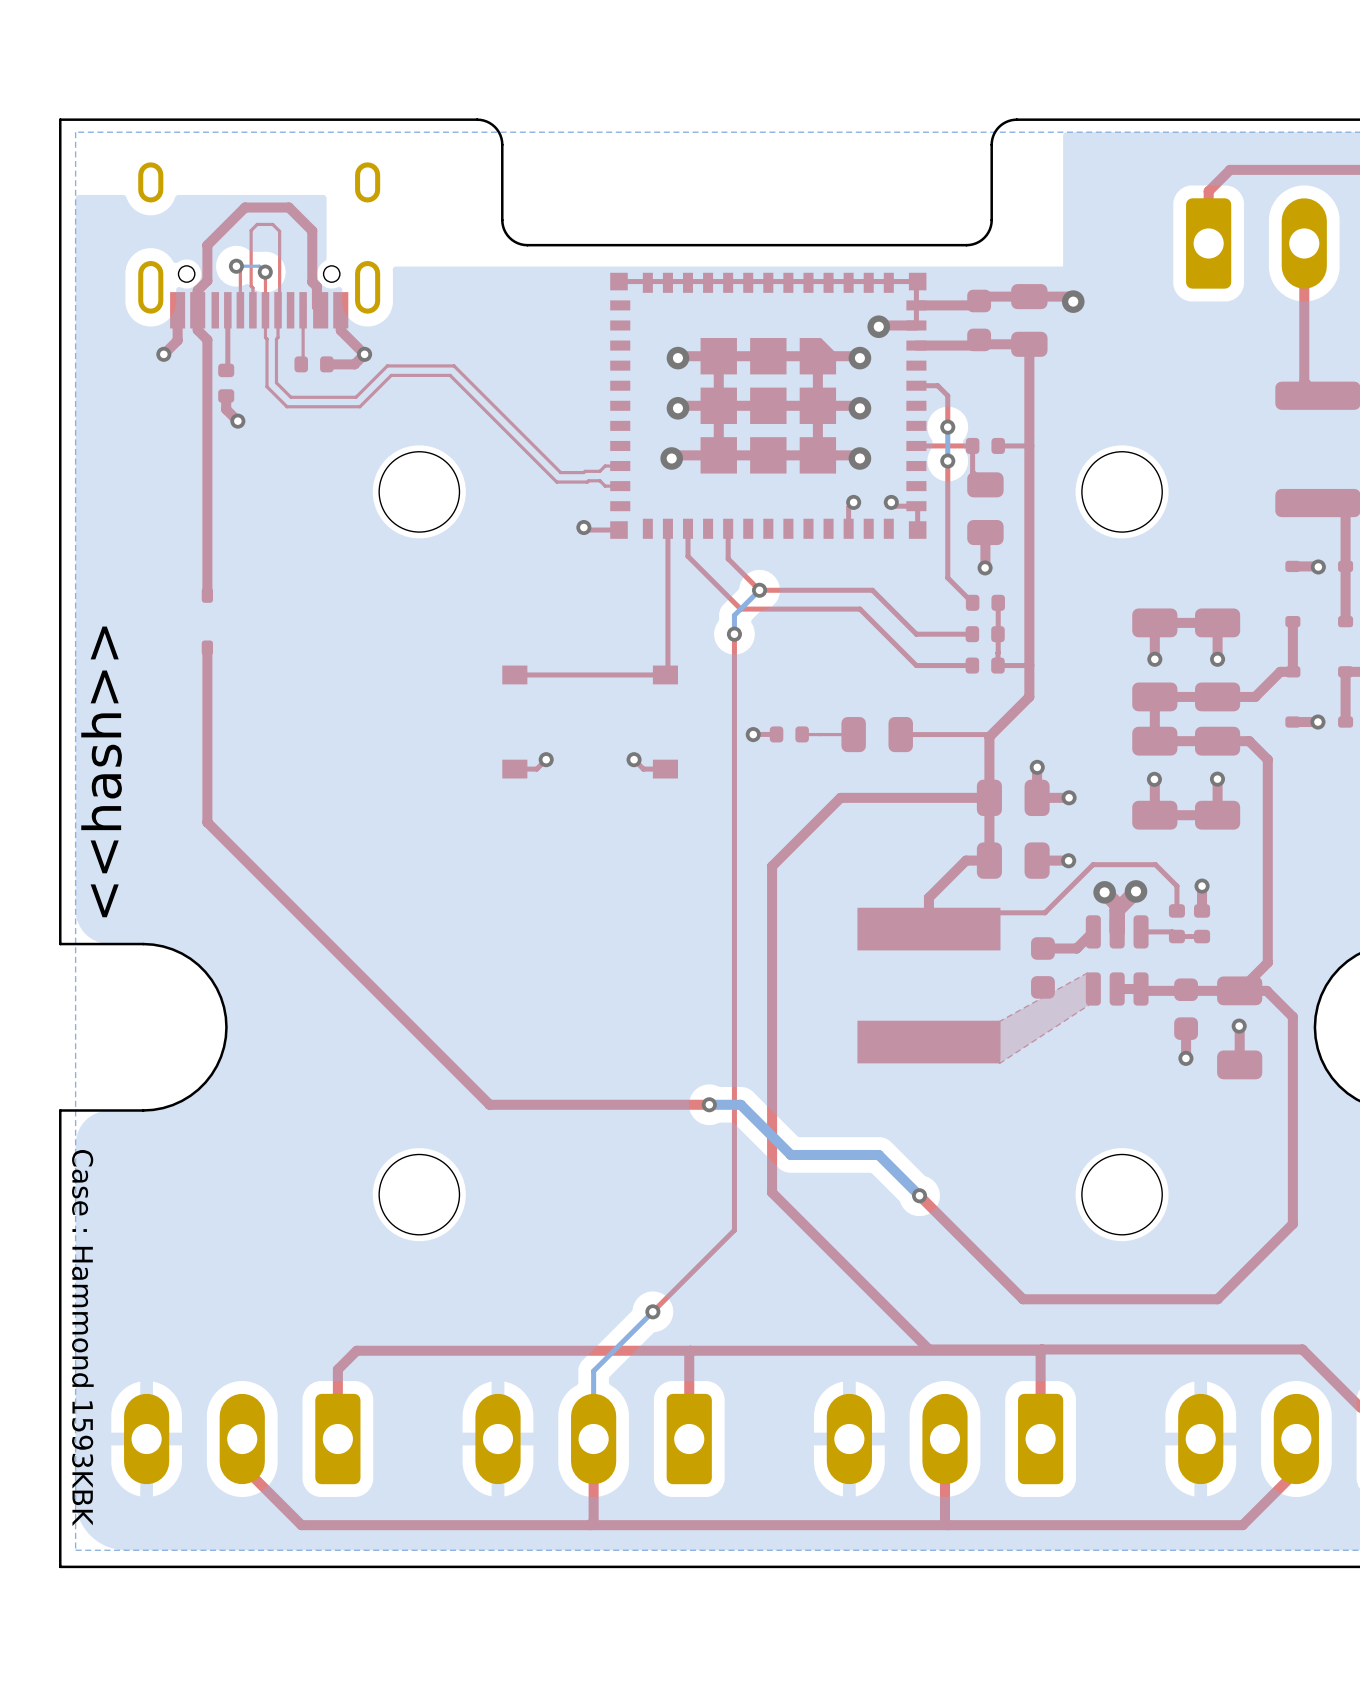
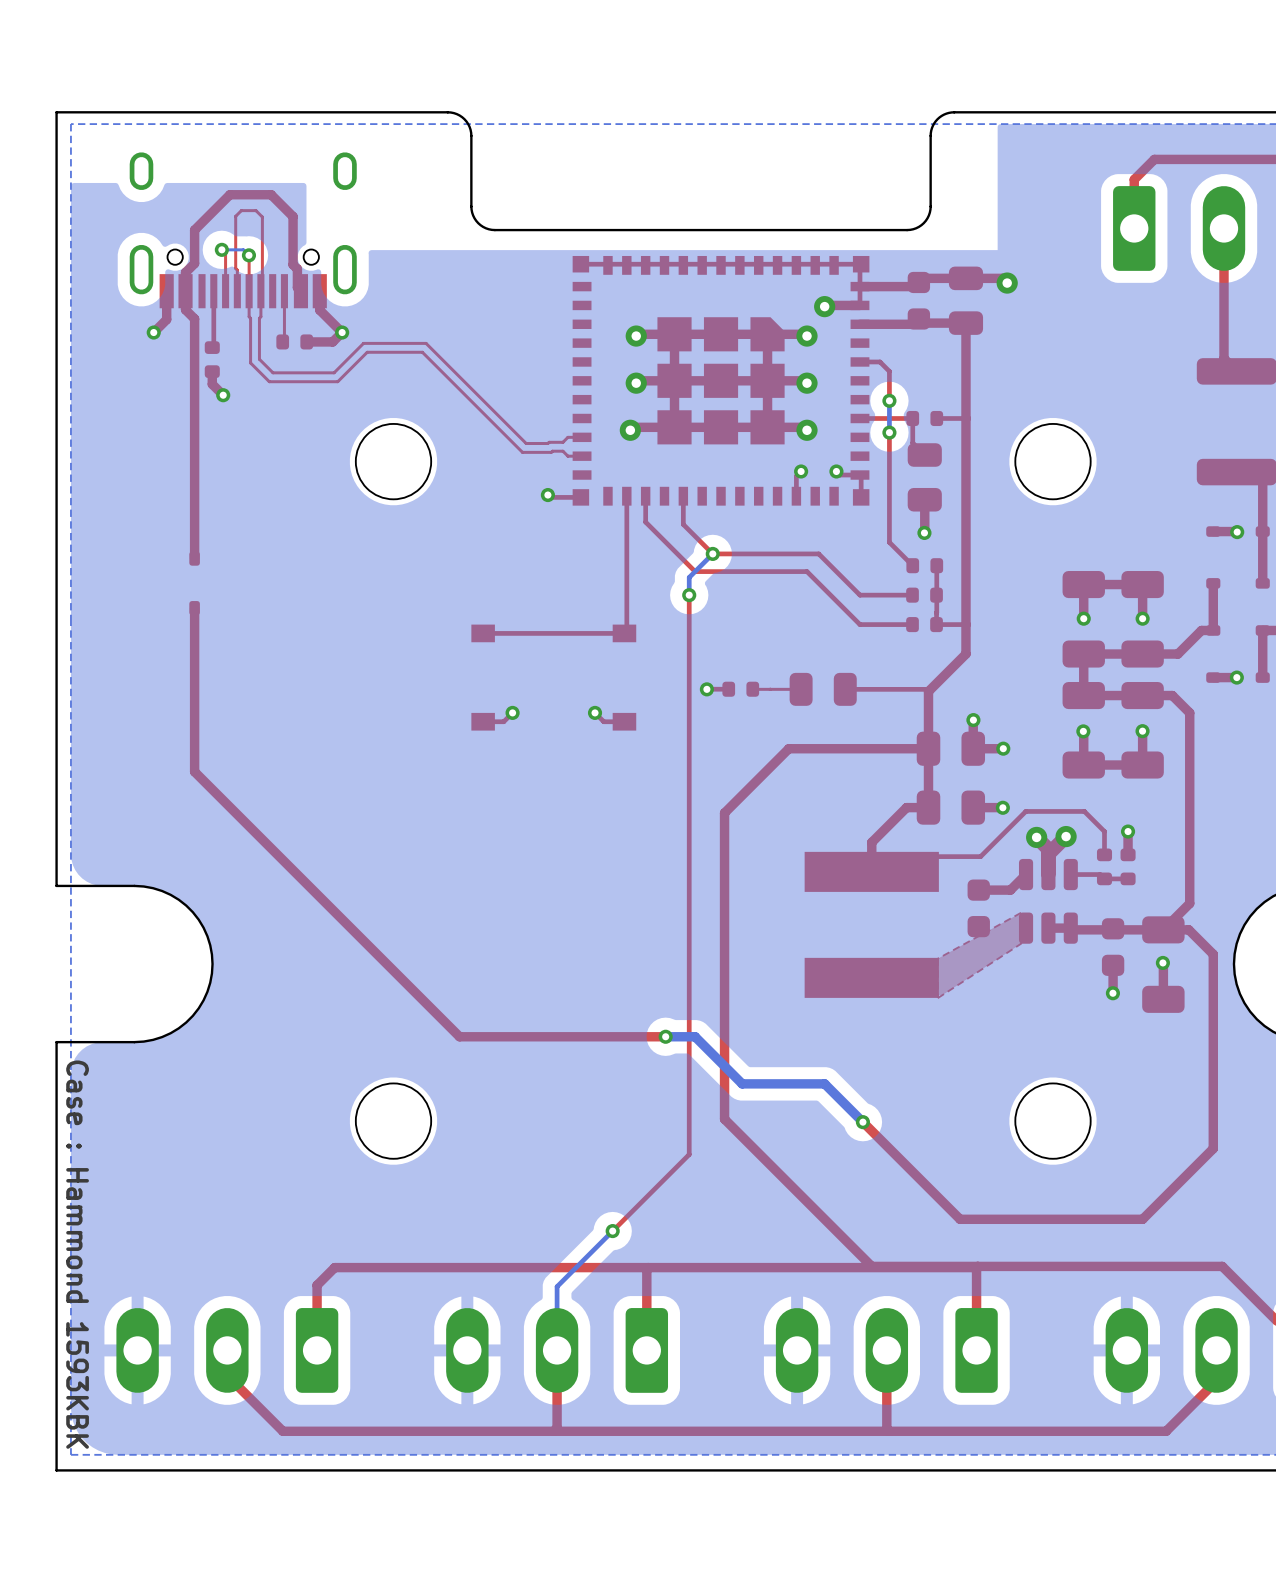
text: <<hash>> (101, 771) -> none

